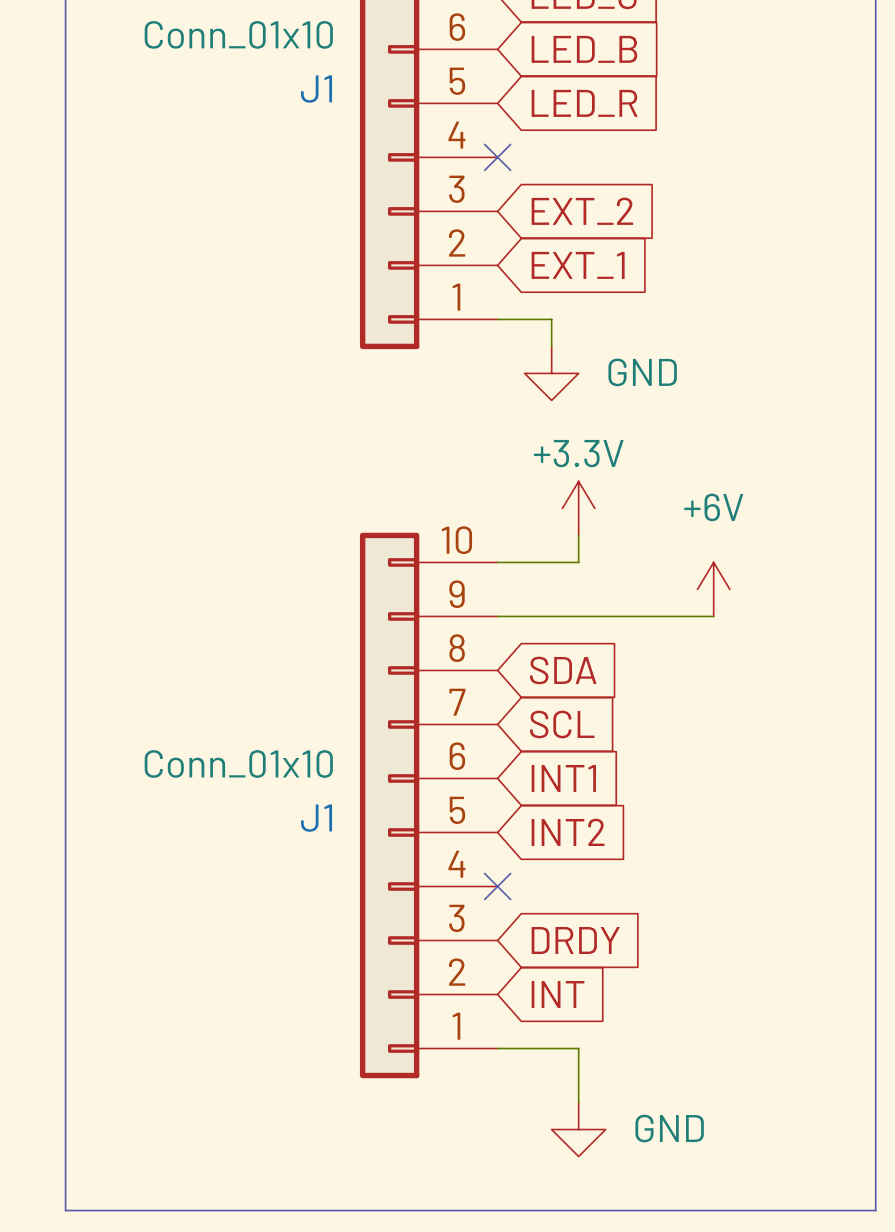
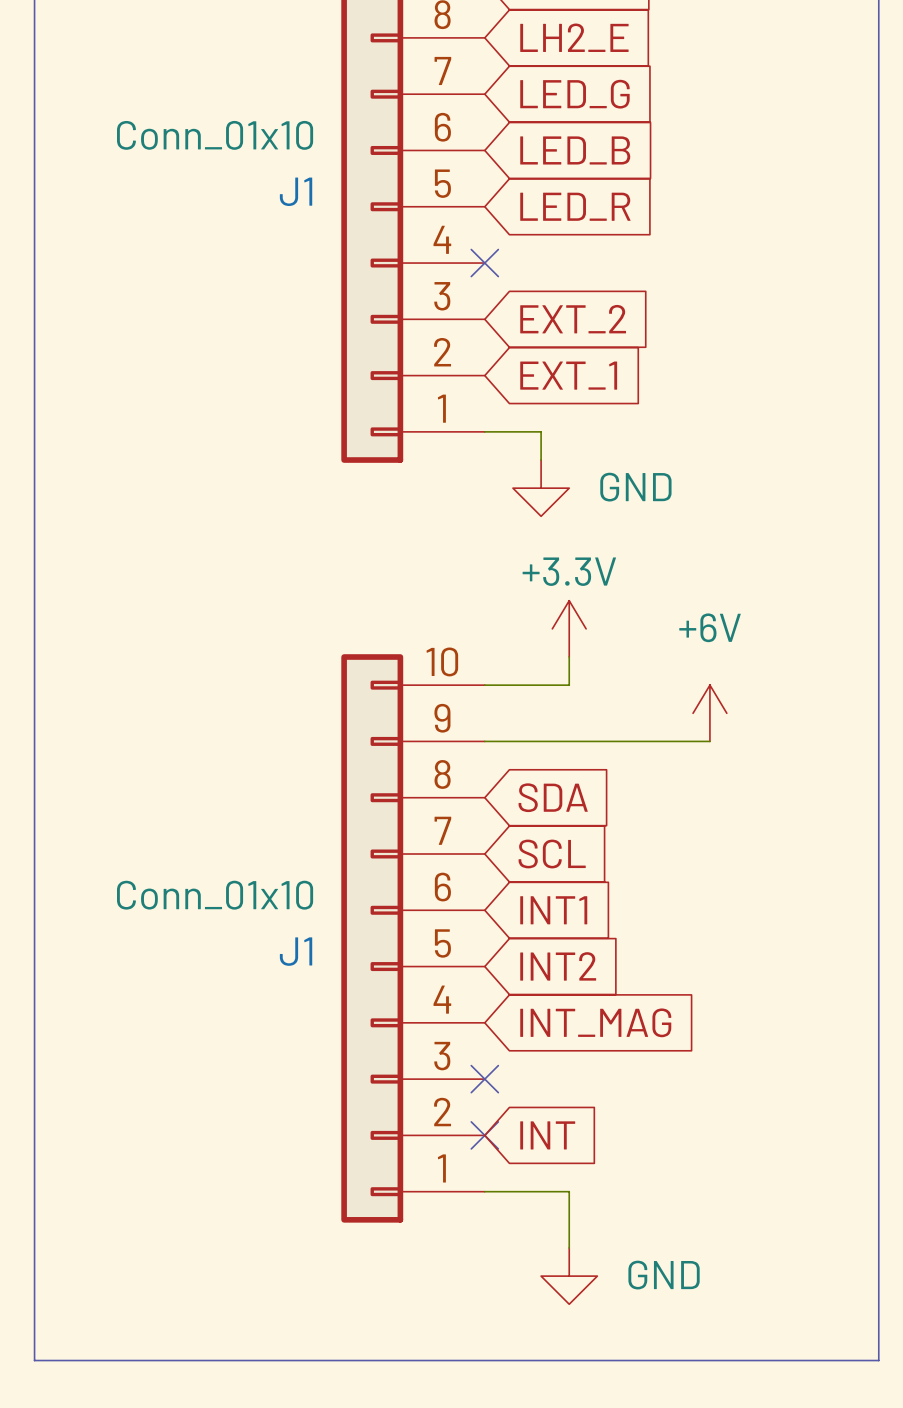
no-connect mark: (497, 886) -> none
global label: none -> INT_MAG (595, 1022)
no-connect mark: none -> (484, 1079)
global label: DRDY (575, 940) -> none
no-connect mark: none -> (484, 1135)

